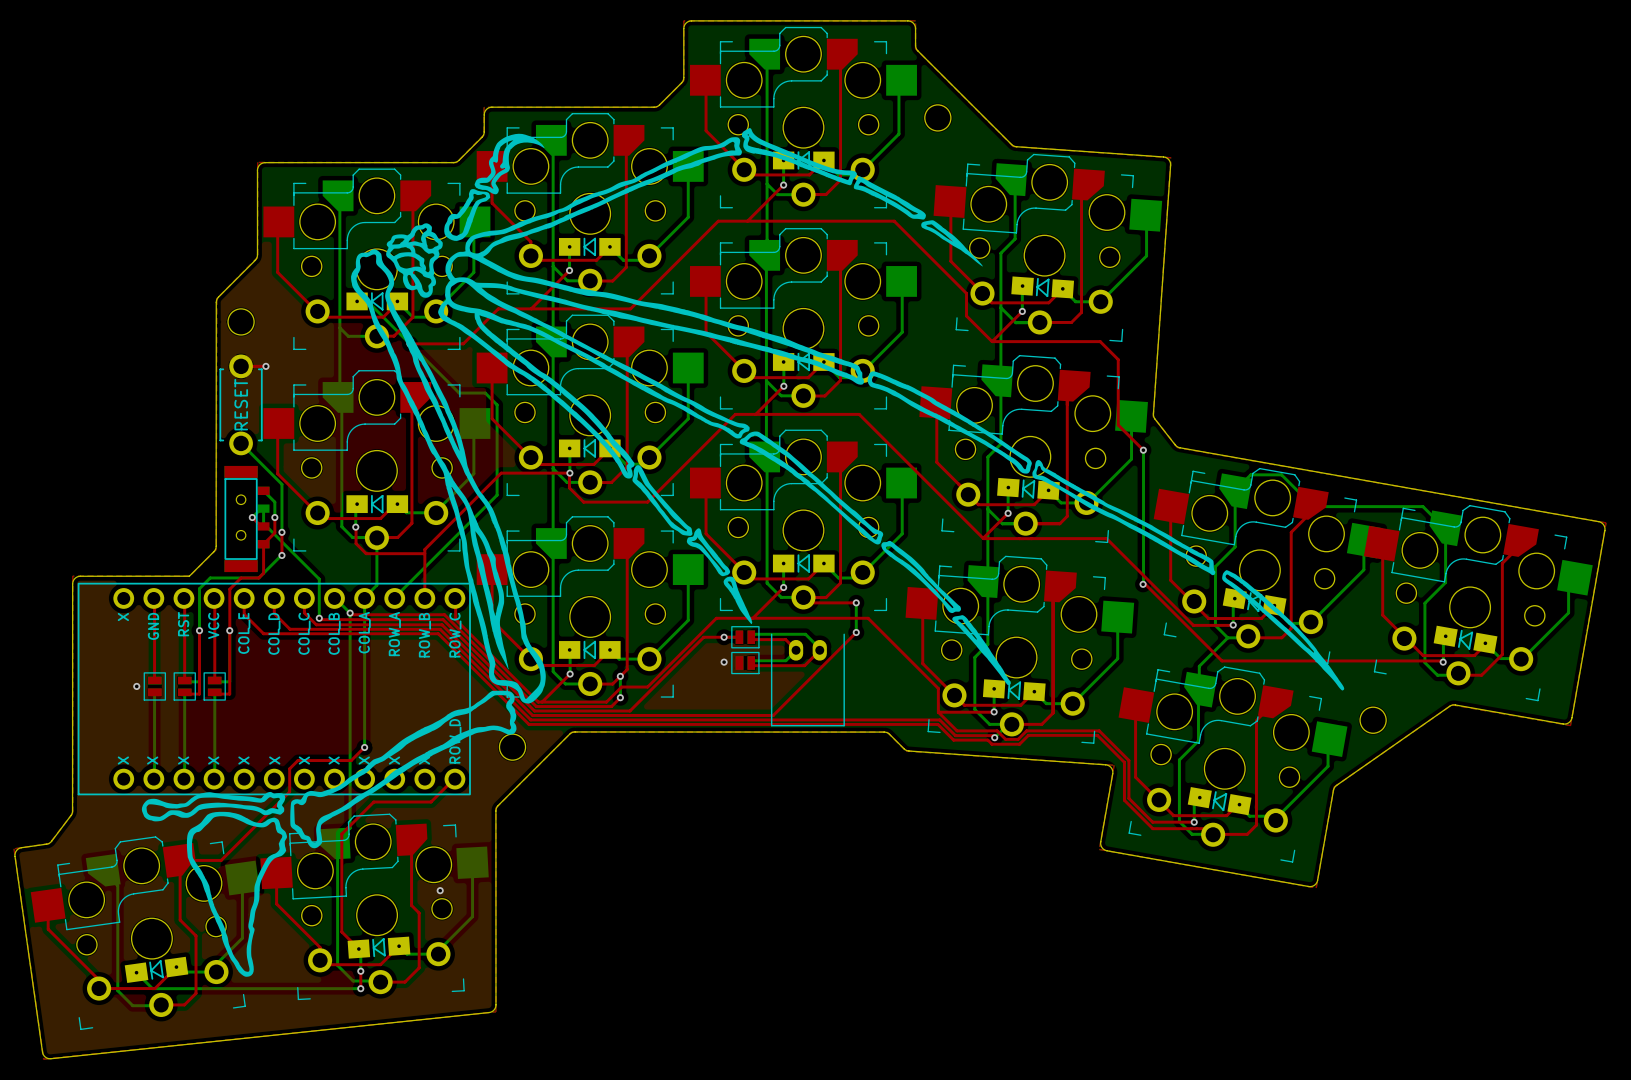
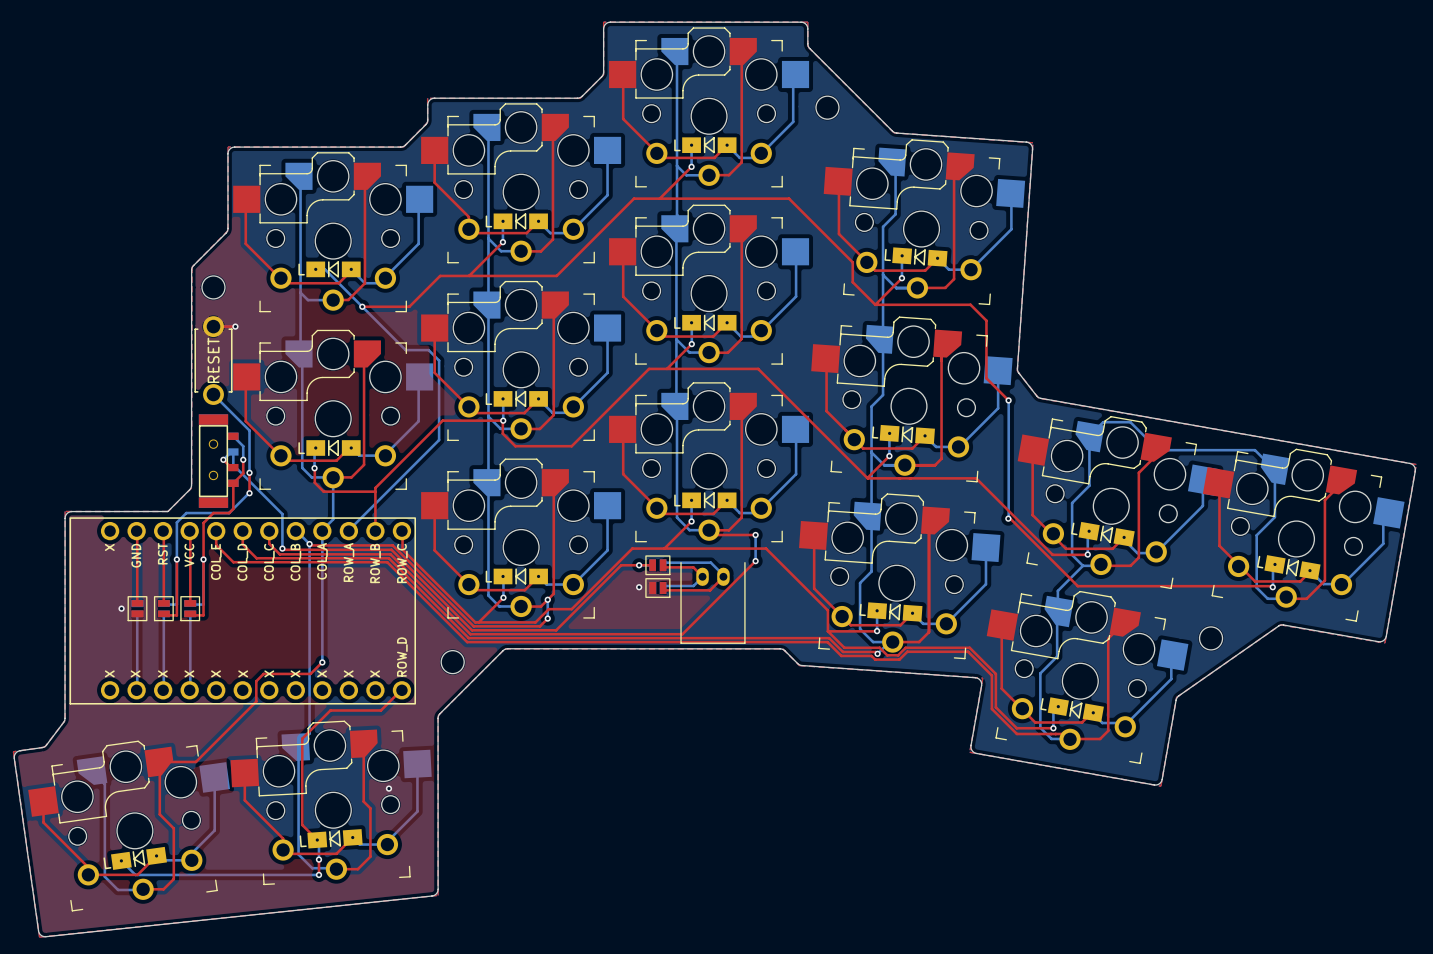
drawing: [141, 128, 1345, 977] -> none
part text: none -> L (677, 145)
part text: none -> L (488, 221)
part text: none -> L (887, 254)
part text: none -> L (301, 269)
part text: none -> L (677, 322)
part text: none -> L (488, 399)
part text: none -> L (875, 432)
part text: none -> L (301, 448)
part text: none -> L (677, 500)
part text: none -> L (1074, 528)
part text: none -> L (1260, 562)
part text: none -> L (488, 576)
part text: none -> L (862, 609)
part text: none -> L (1043, 704)
part text: none -> L (303, 841)
part text: none -> L (107, 863)

